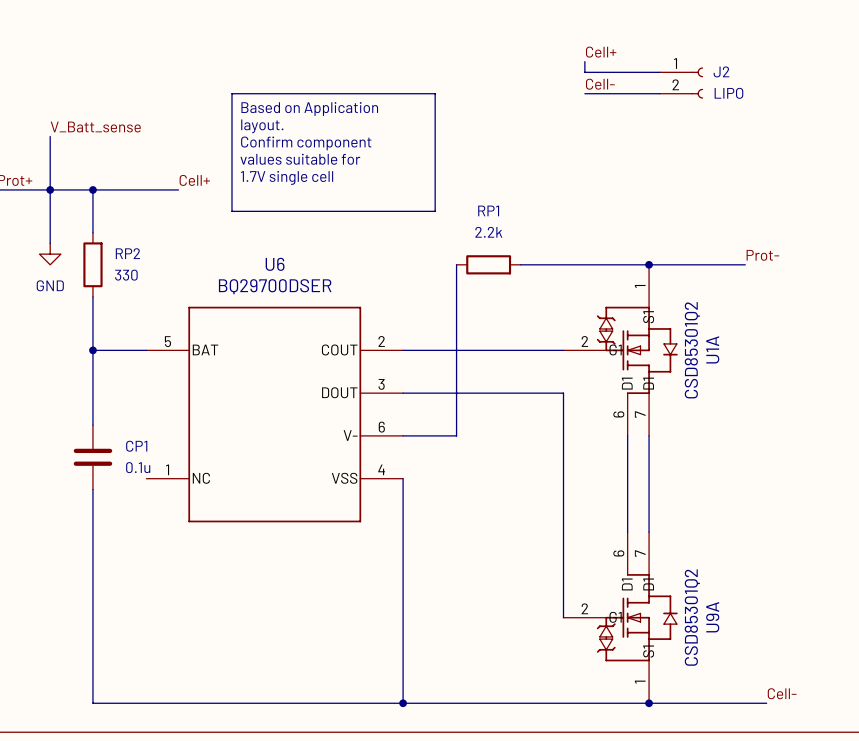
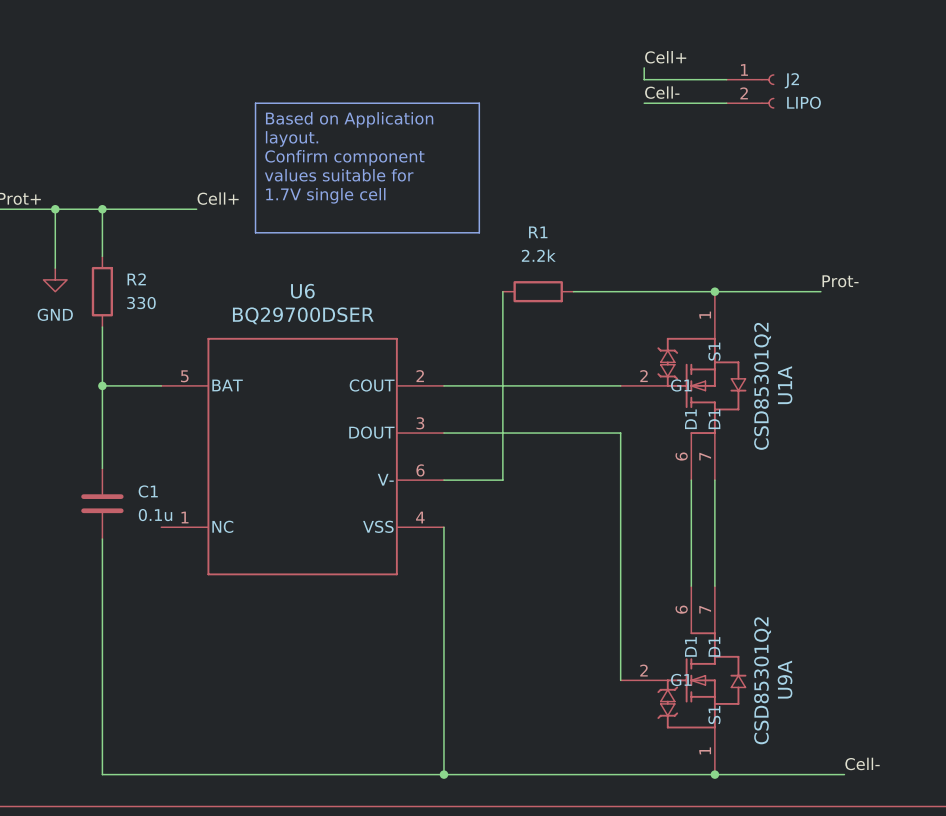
label: V_Batt_sense (95, 127) -> none
wire: (50, 136) (50, 189) -> none
RP1 name: RP1 (488, 210) -> R1 (538, 232)
RP2 name: RP2 (127, 253) -> R2 (136, 279)
CP1 name: CP1 (136, 446) -> C1 (148, 491)

